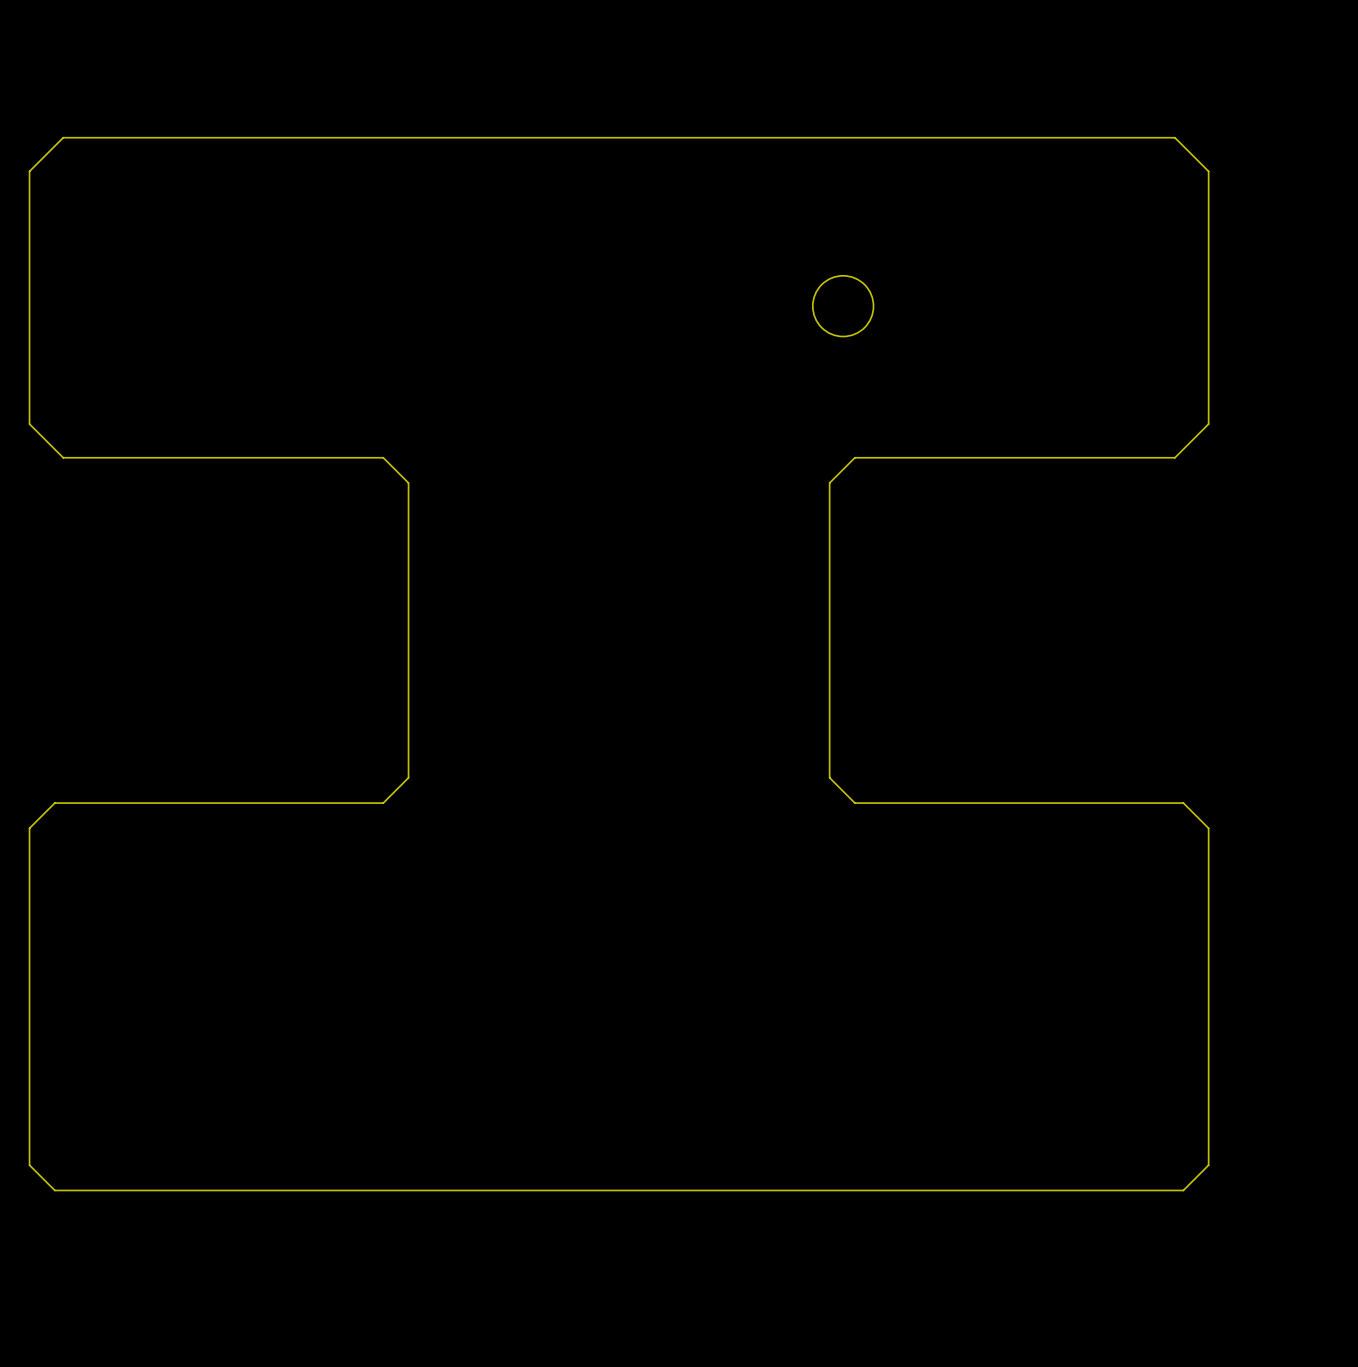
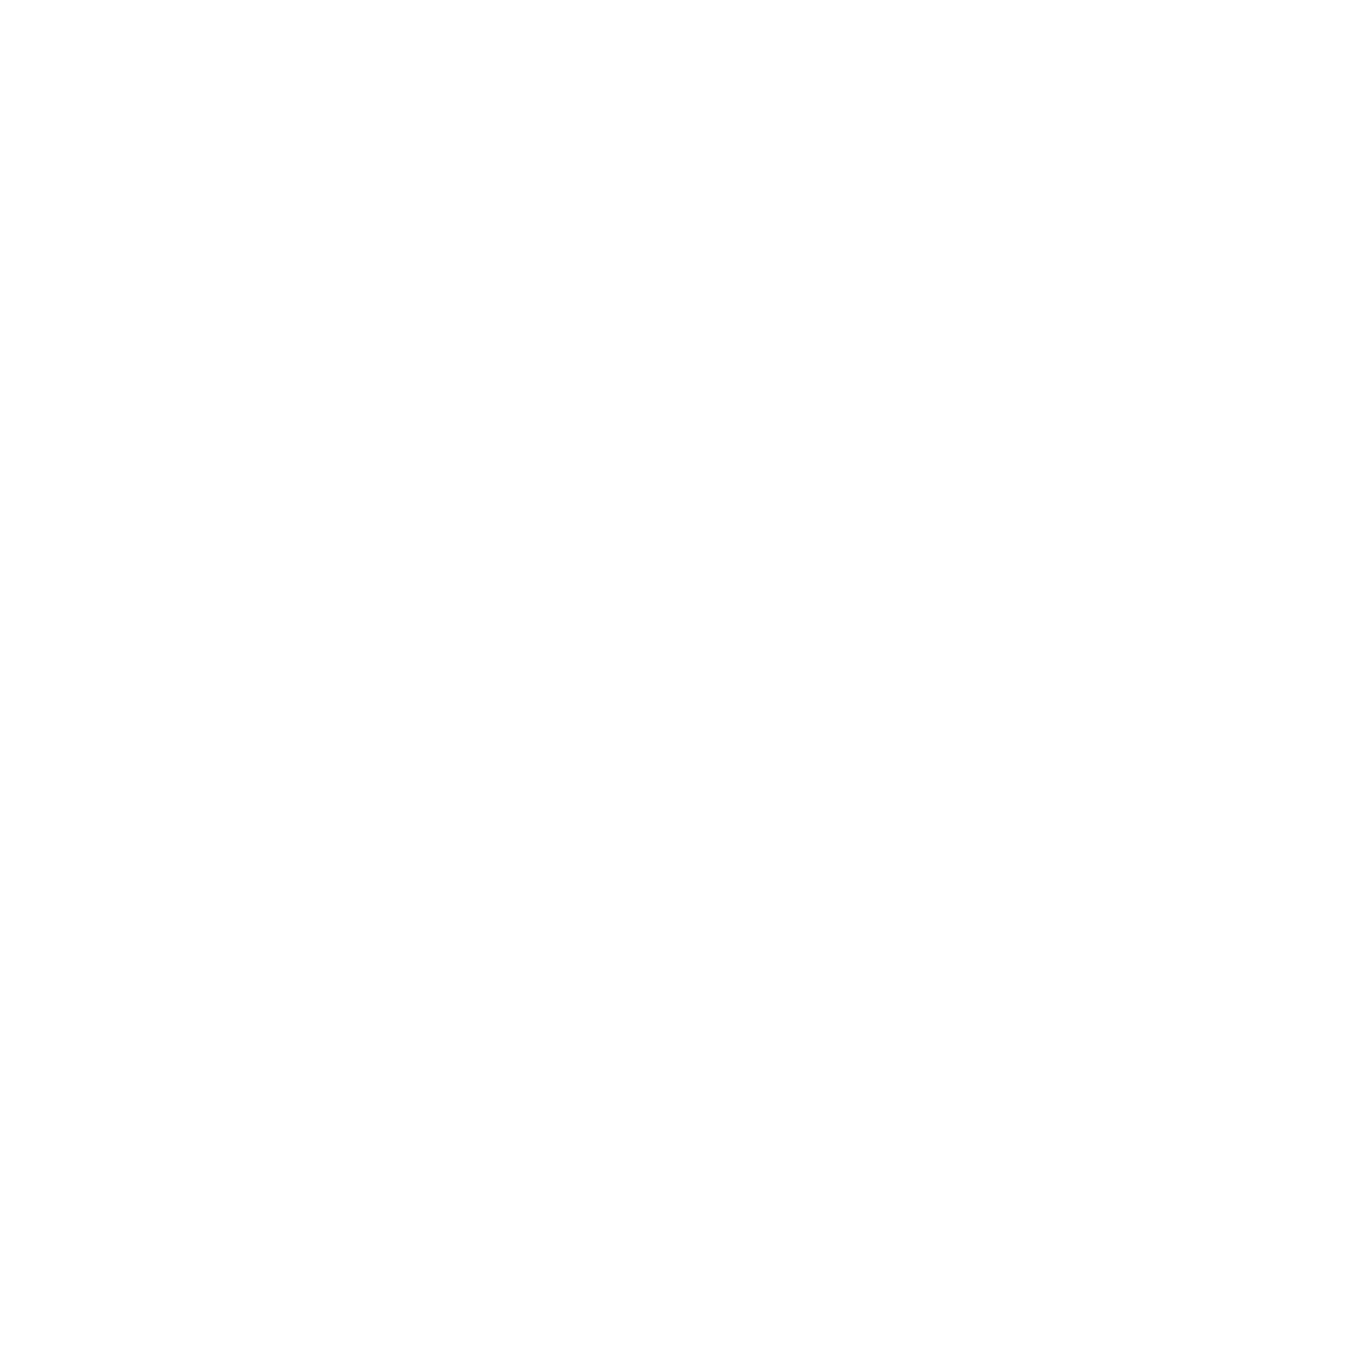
board edge: (63, 137) (29, 171) (29, 424) (63, 457) (383, 457) (408, 483) (408, 777) (383, 803) (54, 803) (29, 828) (29, 1165) (54, 1190) (1183, 1190) (1208, 1165) (1208, 828) (1183, 803) (854, 803) (829, 777) (829, 483) (854, 457) (1174, 457) (1208, 424) (1208, 171) (1174, 137) (63, 137) -> none
round board edge: [811, 274, 875, 338] -> none

